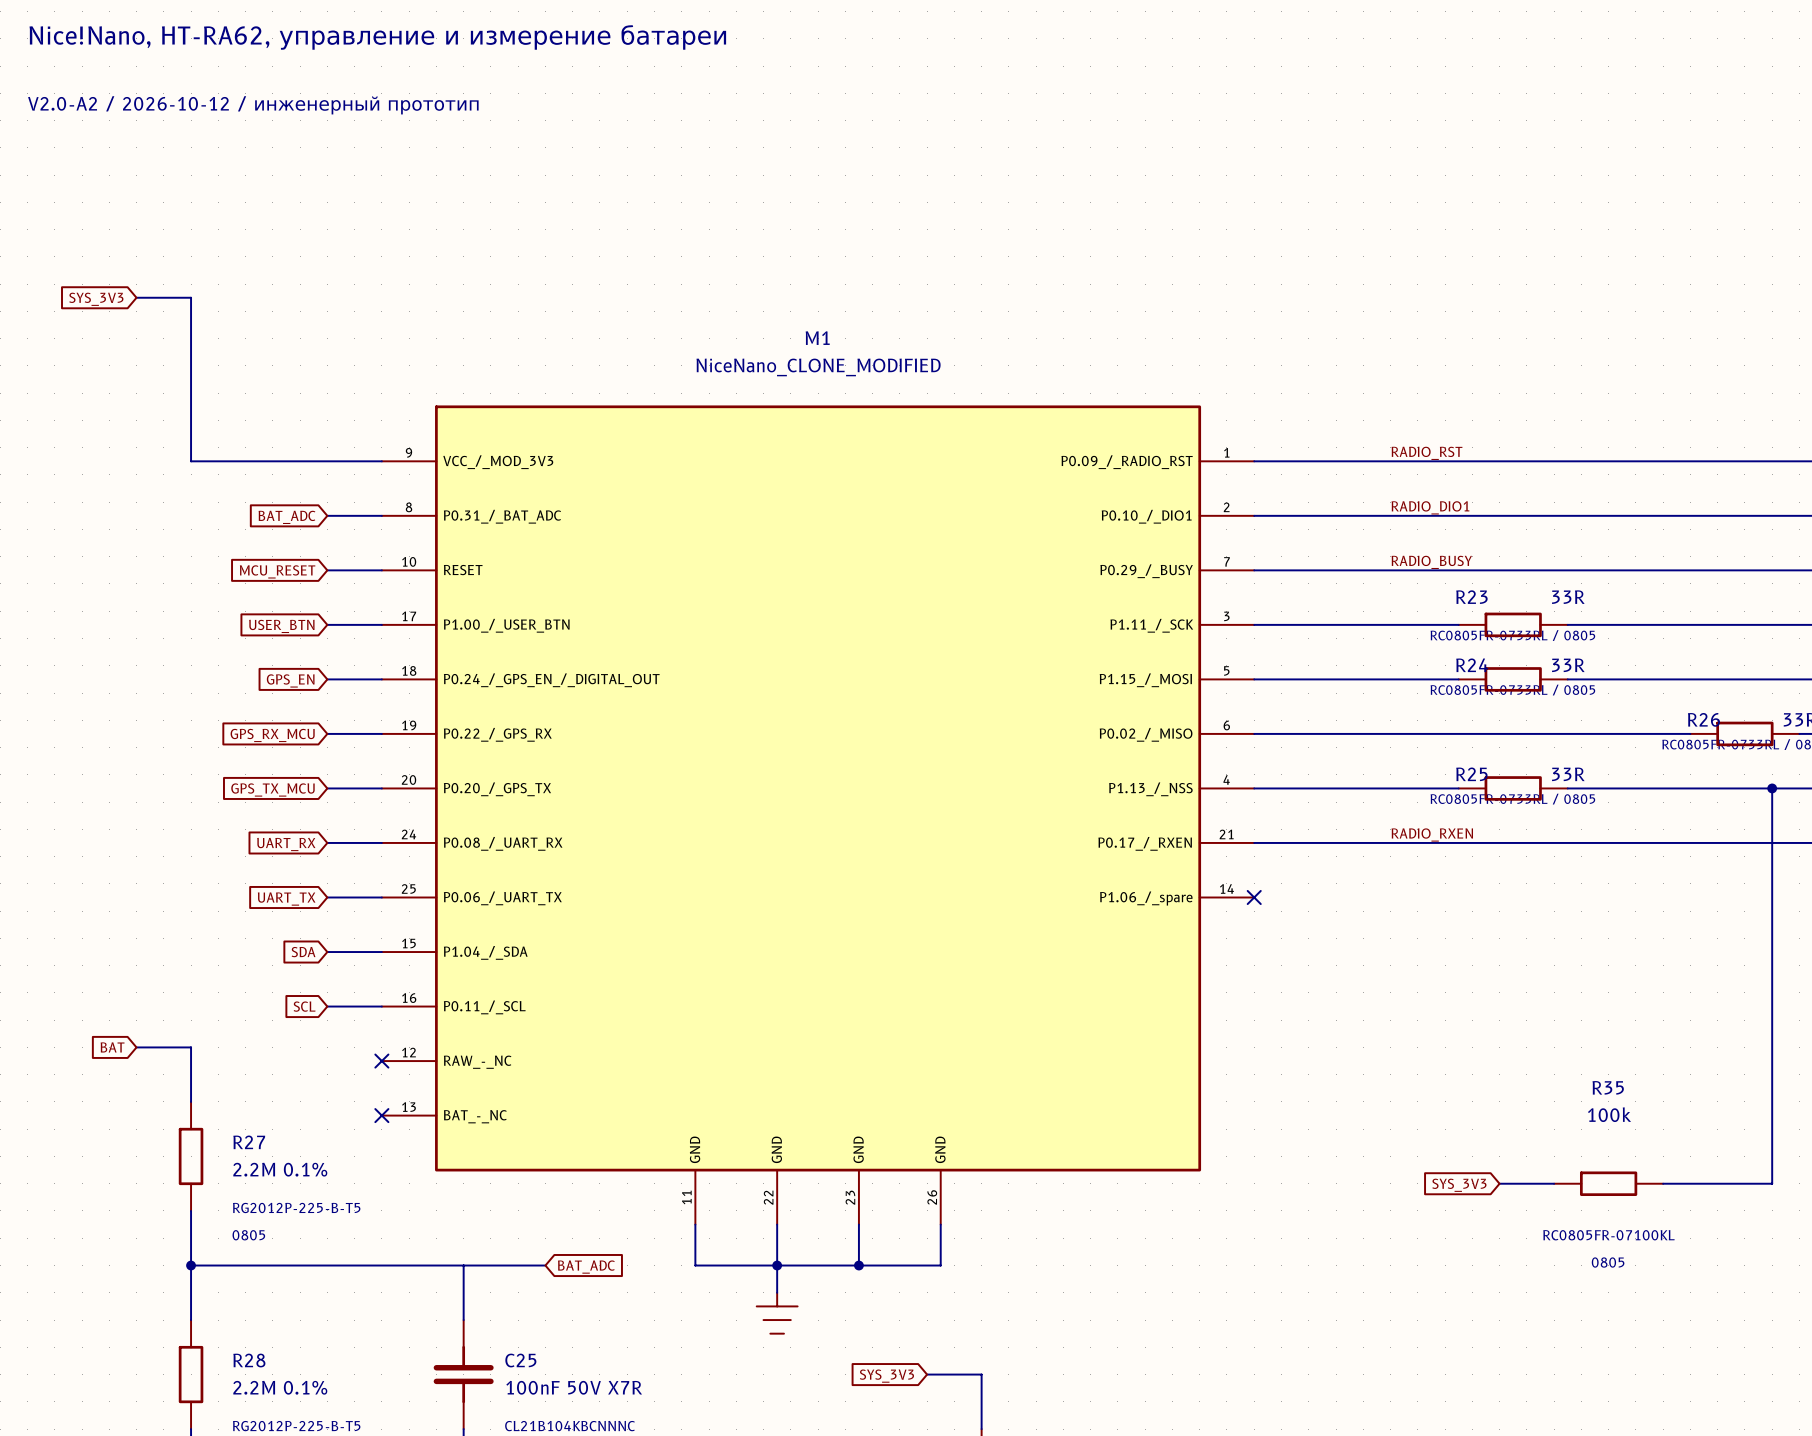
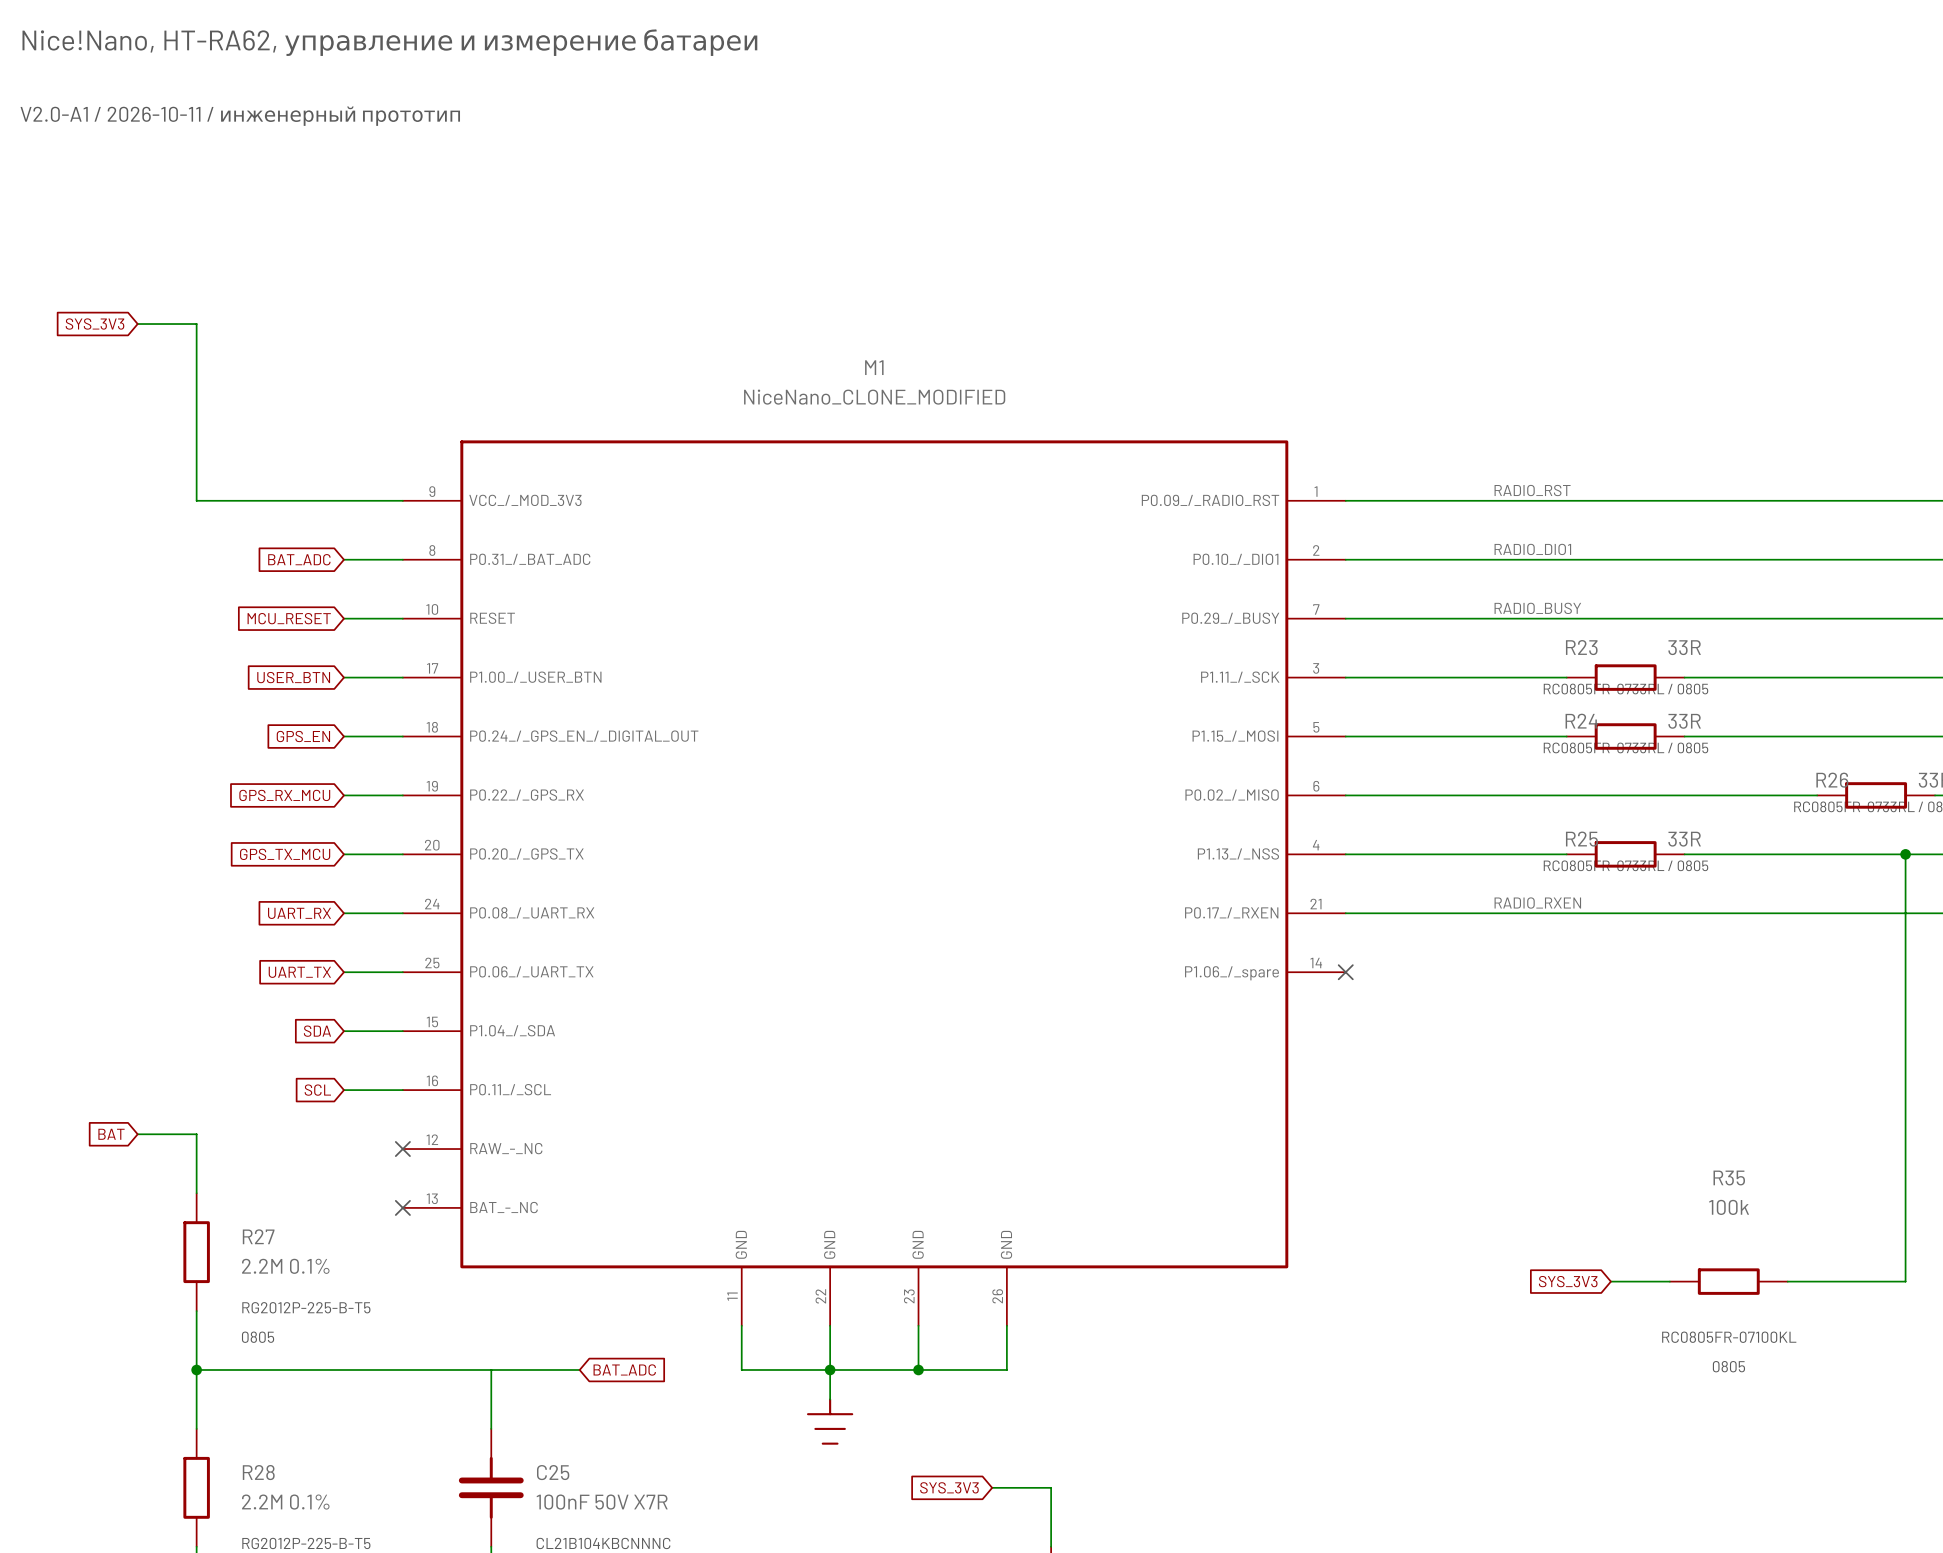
text: V2.0-A2 / 2026-10-12 / инженерный прототип (253, 105) -> V2.0-A1 / 2026-10-11 / инженерный прототип (240, 116)

